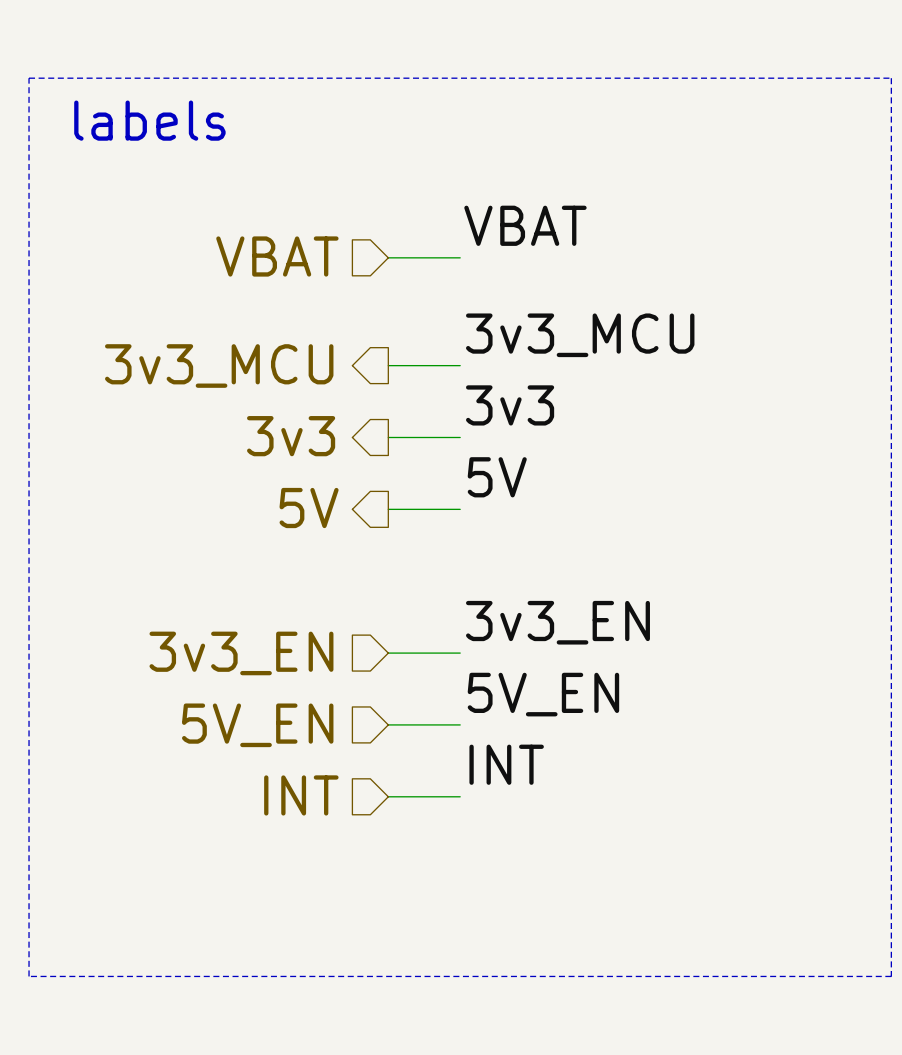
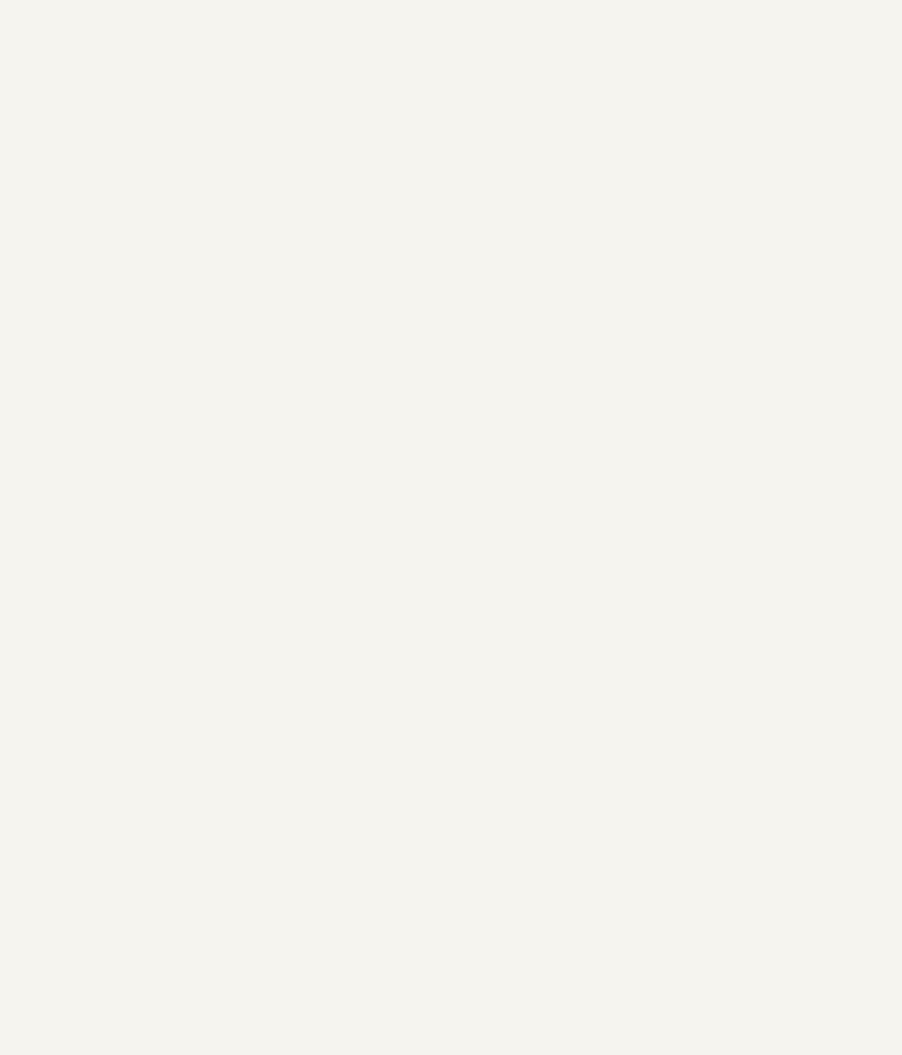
line: (29, 78) (891, 78) (891, 976) (29, 976) (29, 78) -> none
text: labels (149, 120) -> none
label: VBAT (525, 225) -> none
hierarchical label: VBAT (277, 256) -> none
wire: (388, 257) (460, 257) -> none
label: 3v3_MCU (580, 335) -> none
wire: (388, 365) (460, 365) -> none
hierarchical label: 3v3_MCU (219, 366) -> none
label: 3v3 (510, 405) -> none
hierarchical label: 3v3 (291, 436) -> none
wire: (388, 437) (460, 437) -> none
label: 5V (497, 477) -> none
hierarchical label: 5V (309, 508) -> none
wire: (388, 509) (460, 509) -> none
label: 3v3_EN (557, 622) -> none
hierarchical label: 3v3_EN (241, 653) -> none
wire: (388, 653) (460, 653) -> none
label: 5V_EN (543, 694) -> none
wire: (388, 724) (460, 724) -> none
hierarchical label: 5V_EN (257, 725) -> none
label: INT (506, 764) -> none
hierarchical label: INT (301, 795) -> none
wire: (388, 796) (460, 796) -> none

